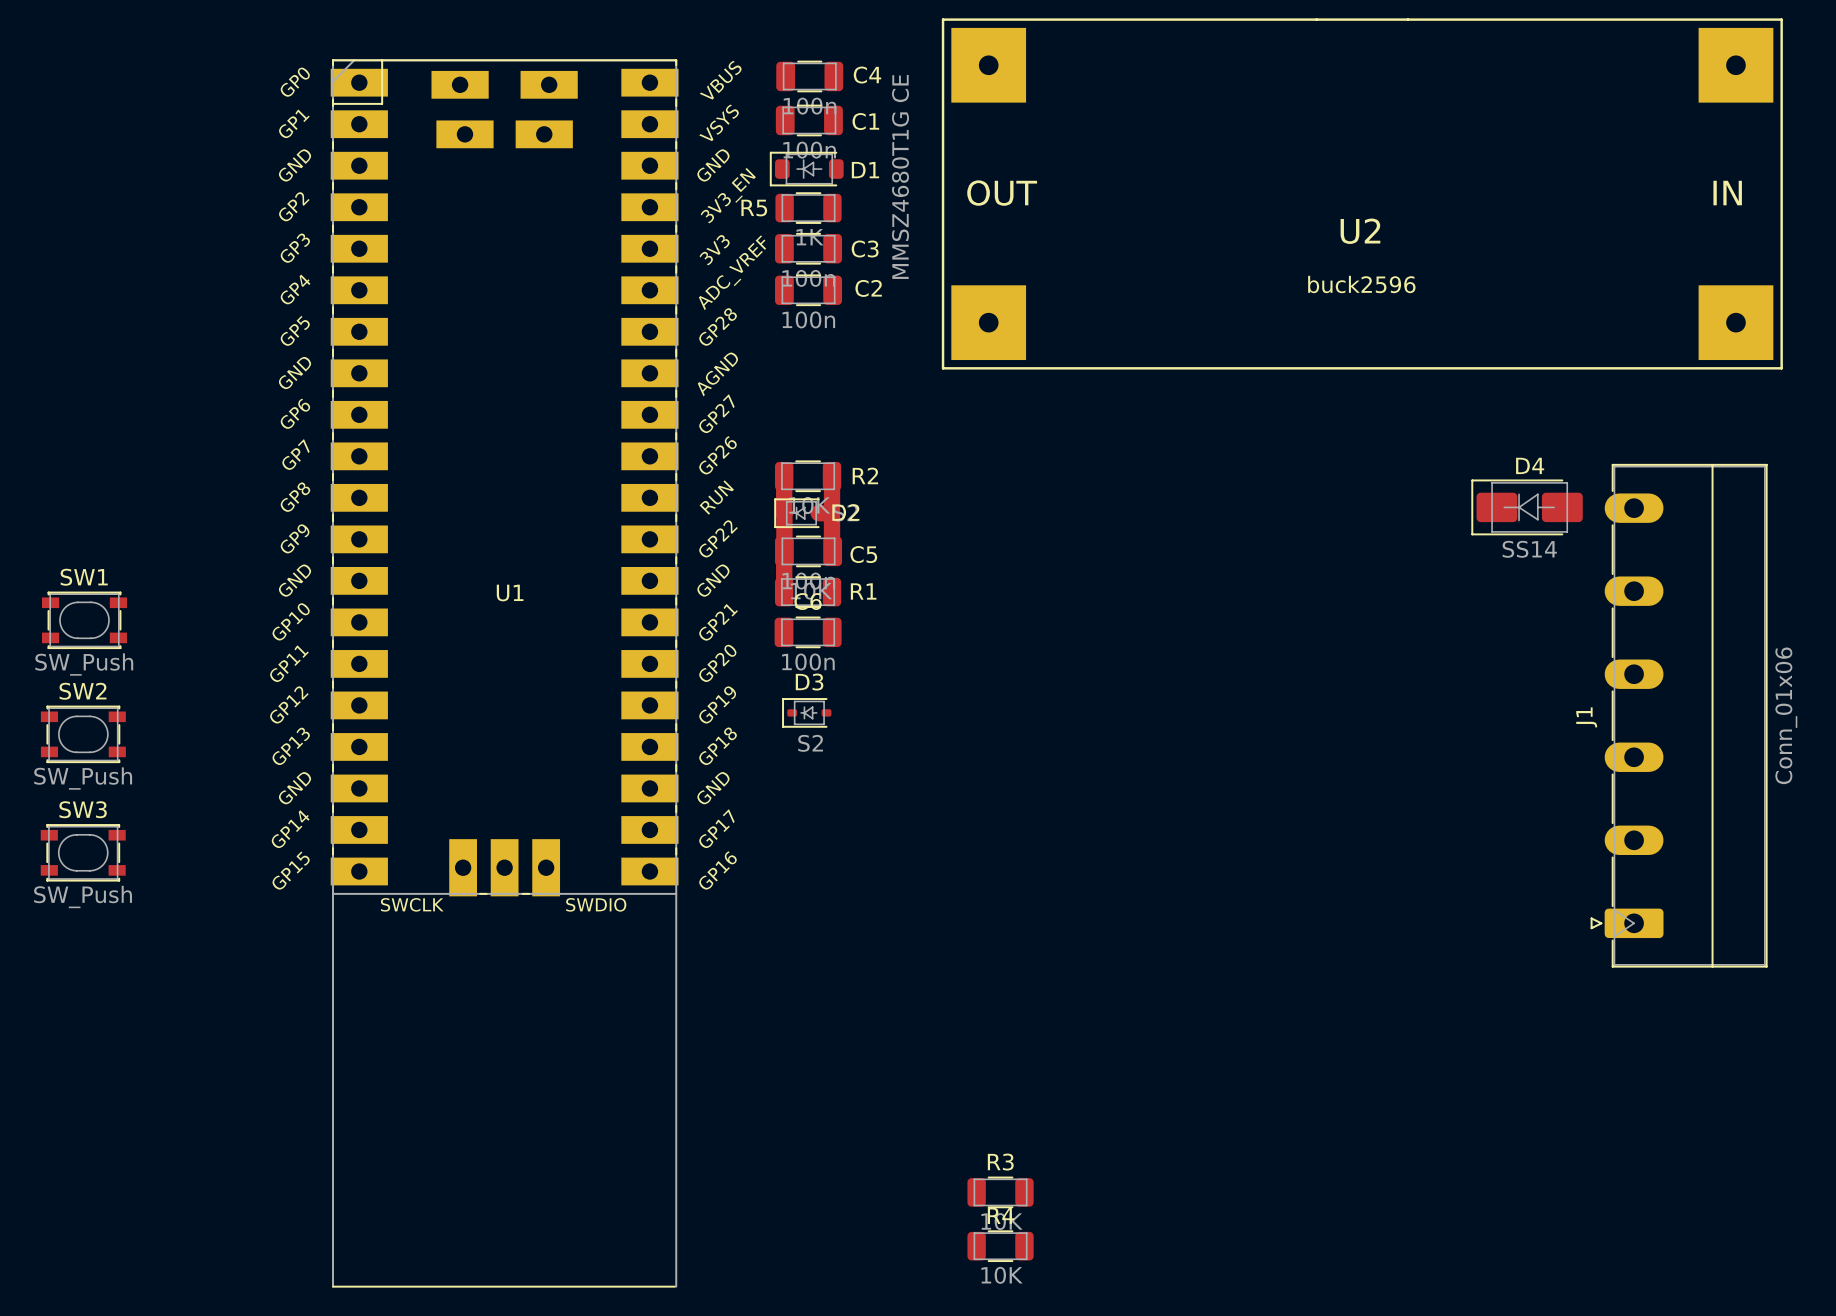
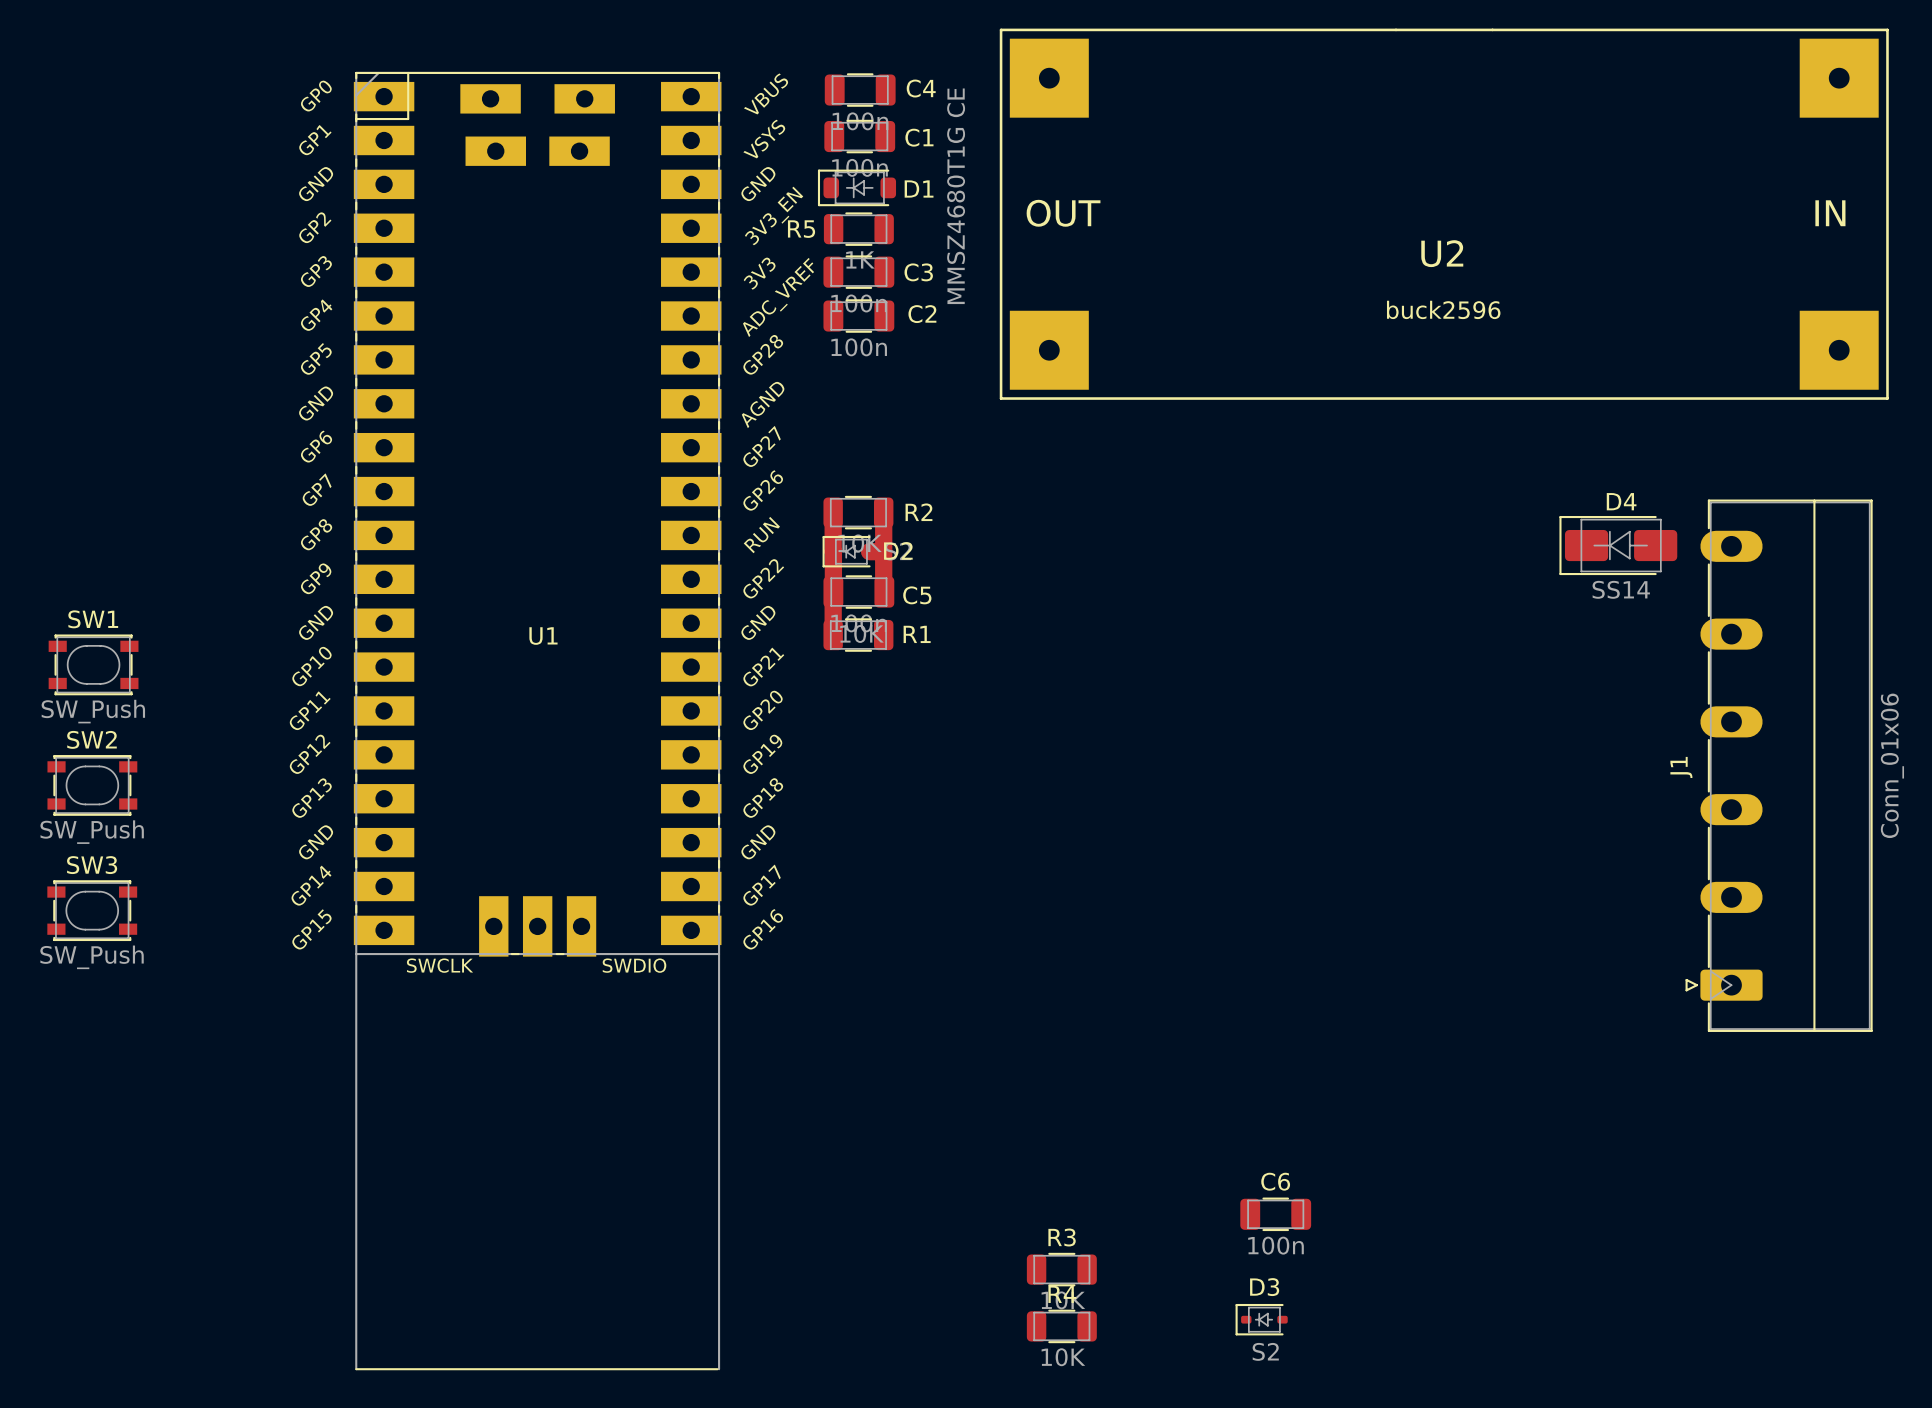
C6 position: (808, 632) -> (1275, 1214)
D3 position: (806, 712) -> (1261, 1319)

